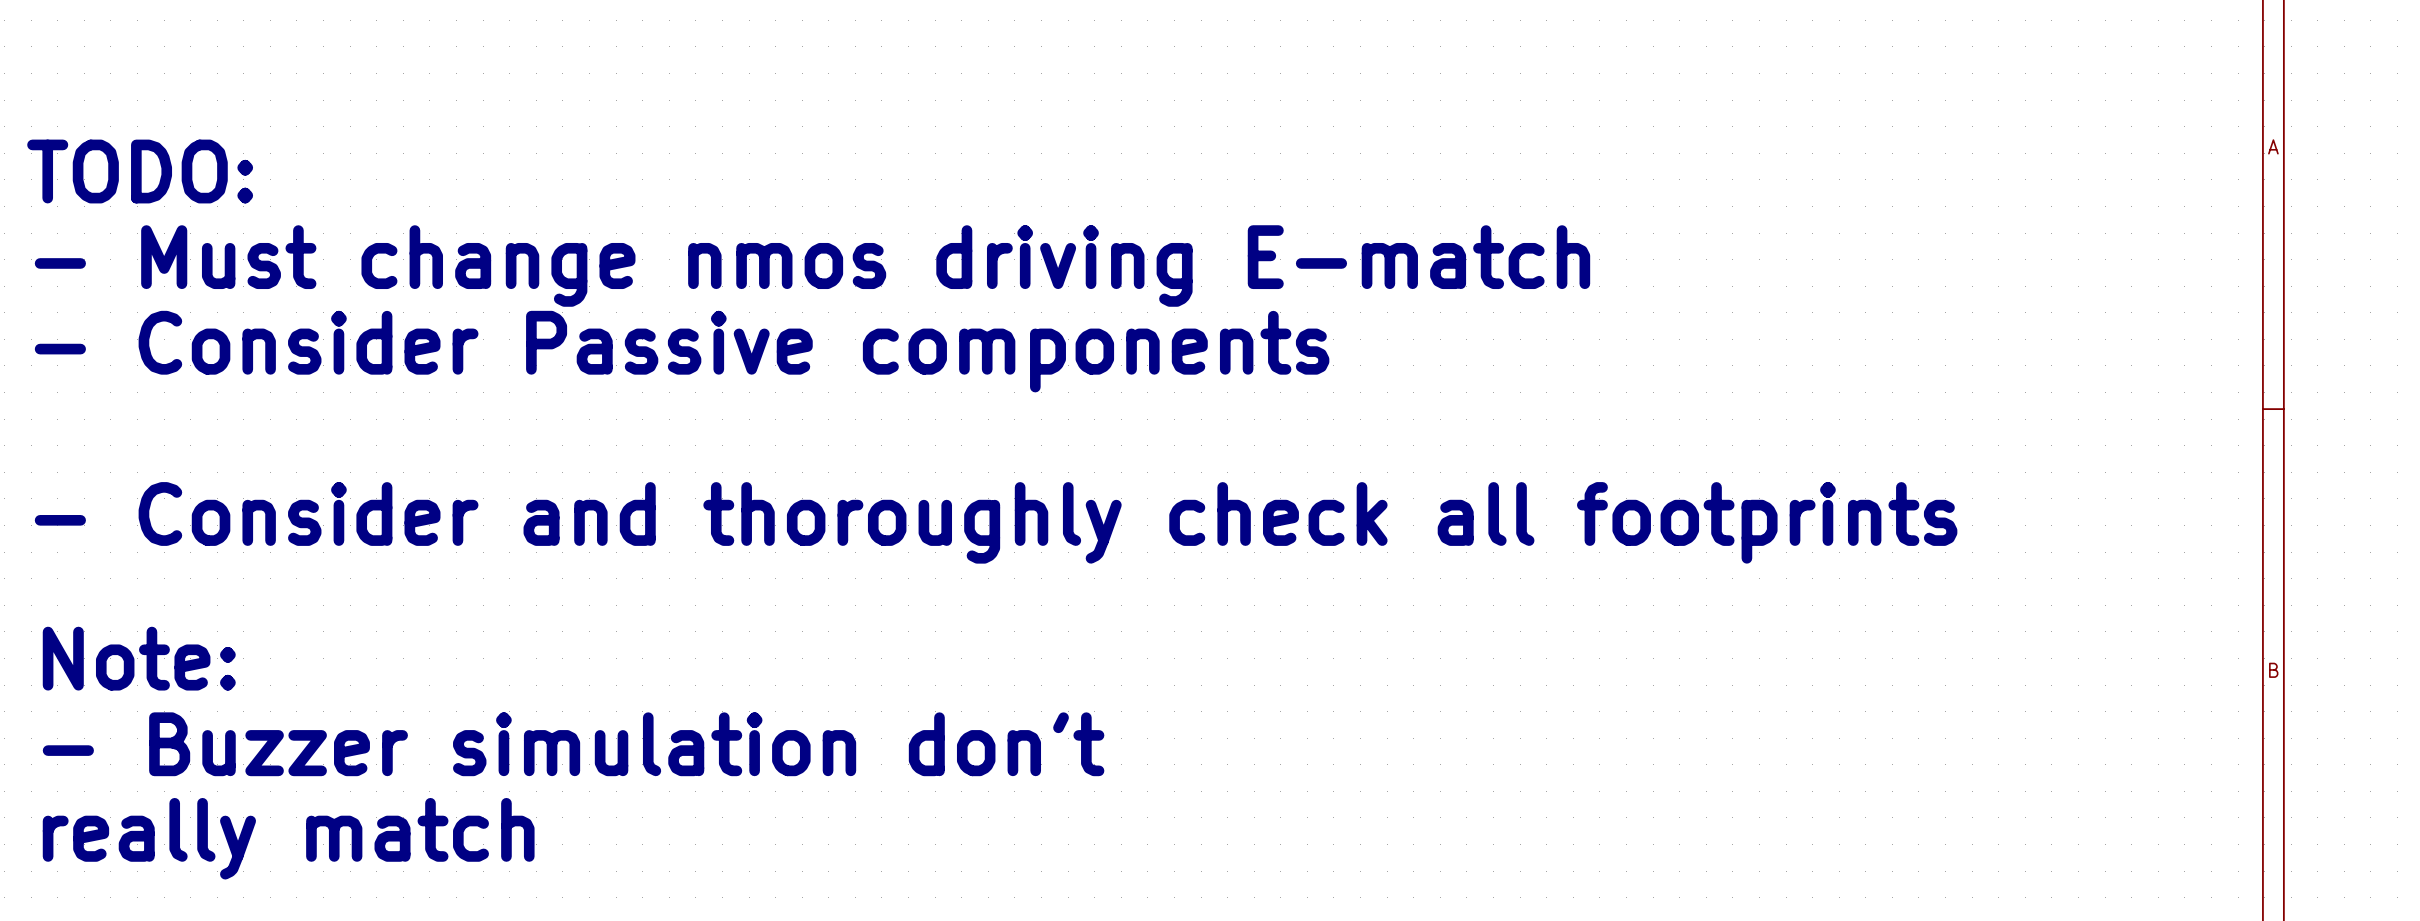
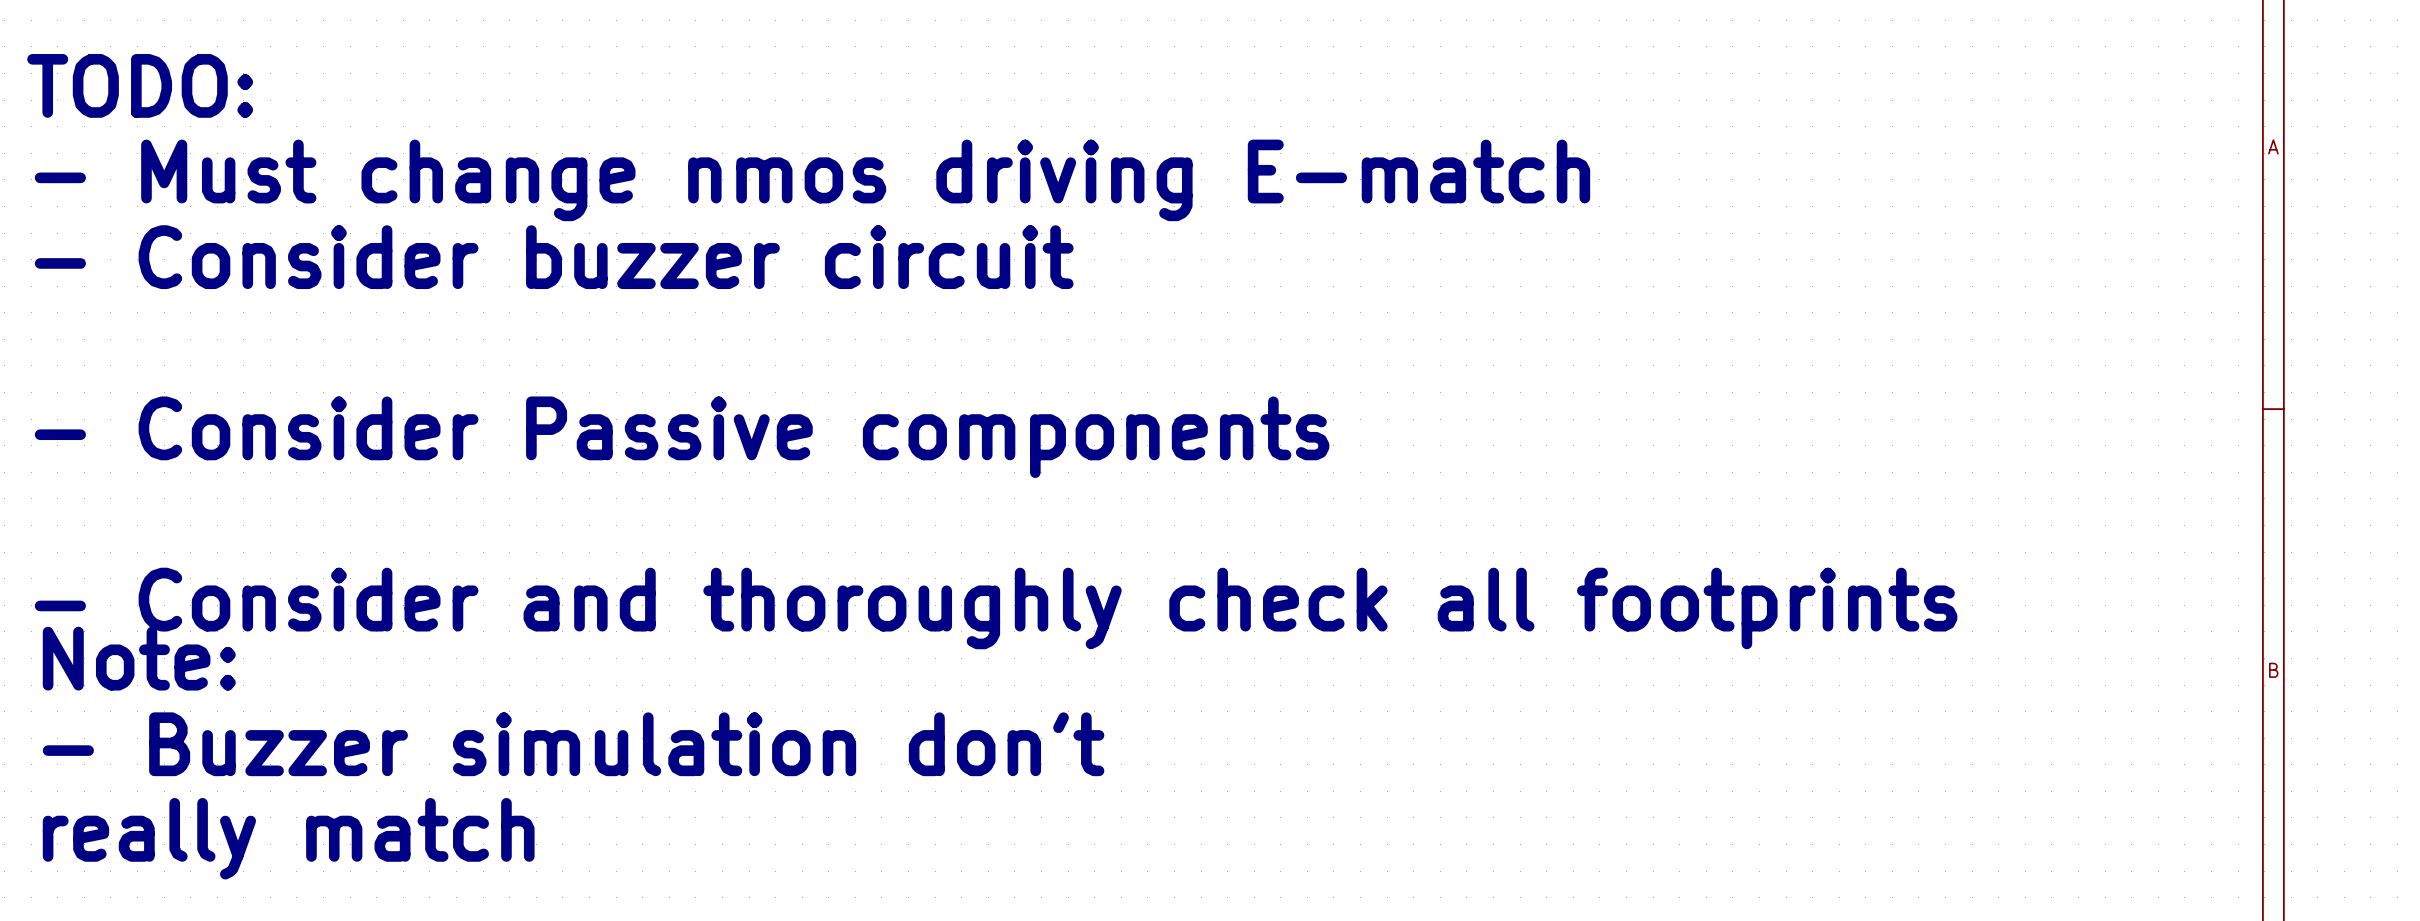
text: none -> TODO: (140, 85)
text: TODO: (140, 171) -> - Must change nmos driving E-match (812, 180)
text: - Must change nmos driving E-match (812, 266) -> - Consider buzzer circuit (554, 257)
text position: - Consider Passive components (682, 351) -> - Consider Passive components (682, 437)
text position: - Consider and thoroughly check all footprints (996, 522) -> - Consider and thoroughly check all footprints (996, 608)

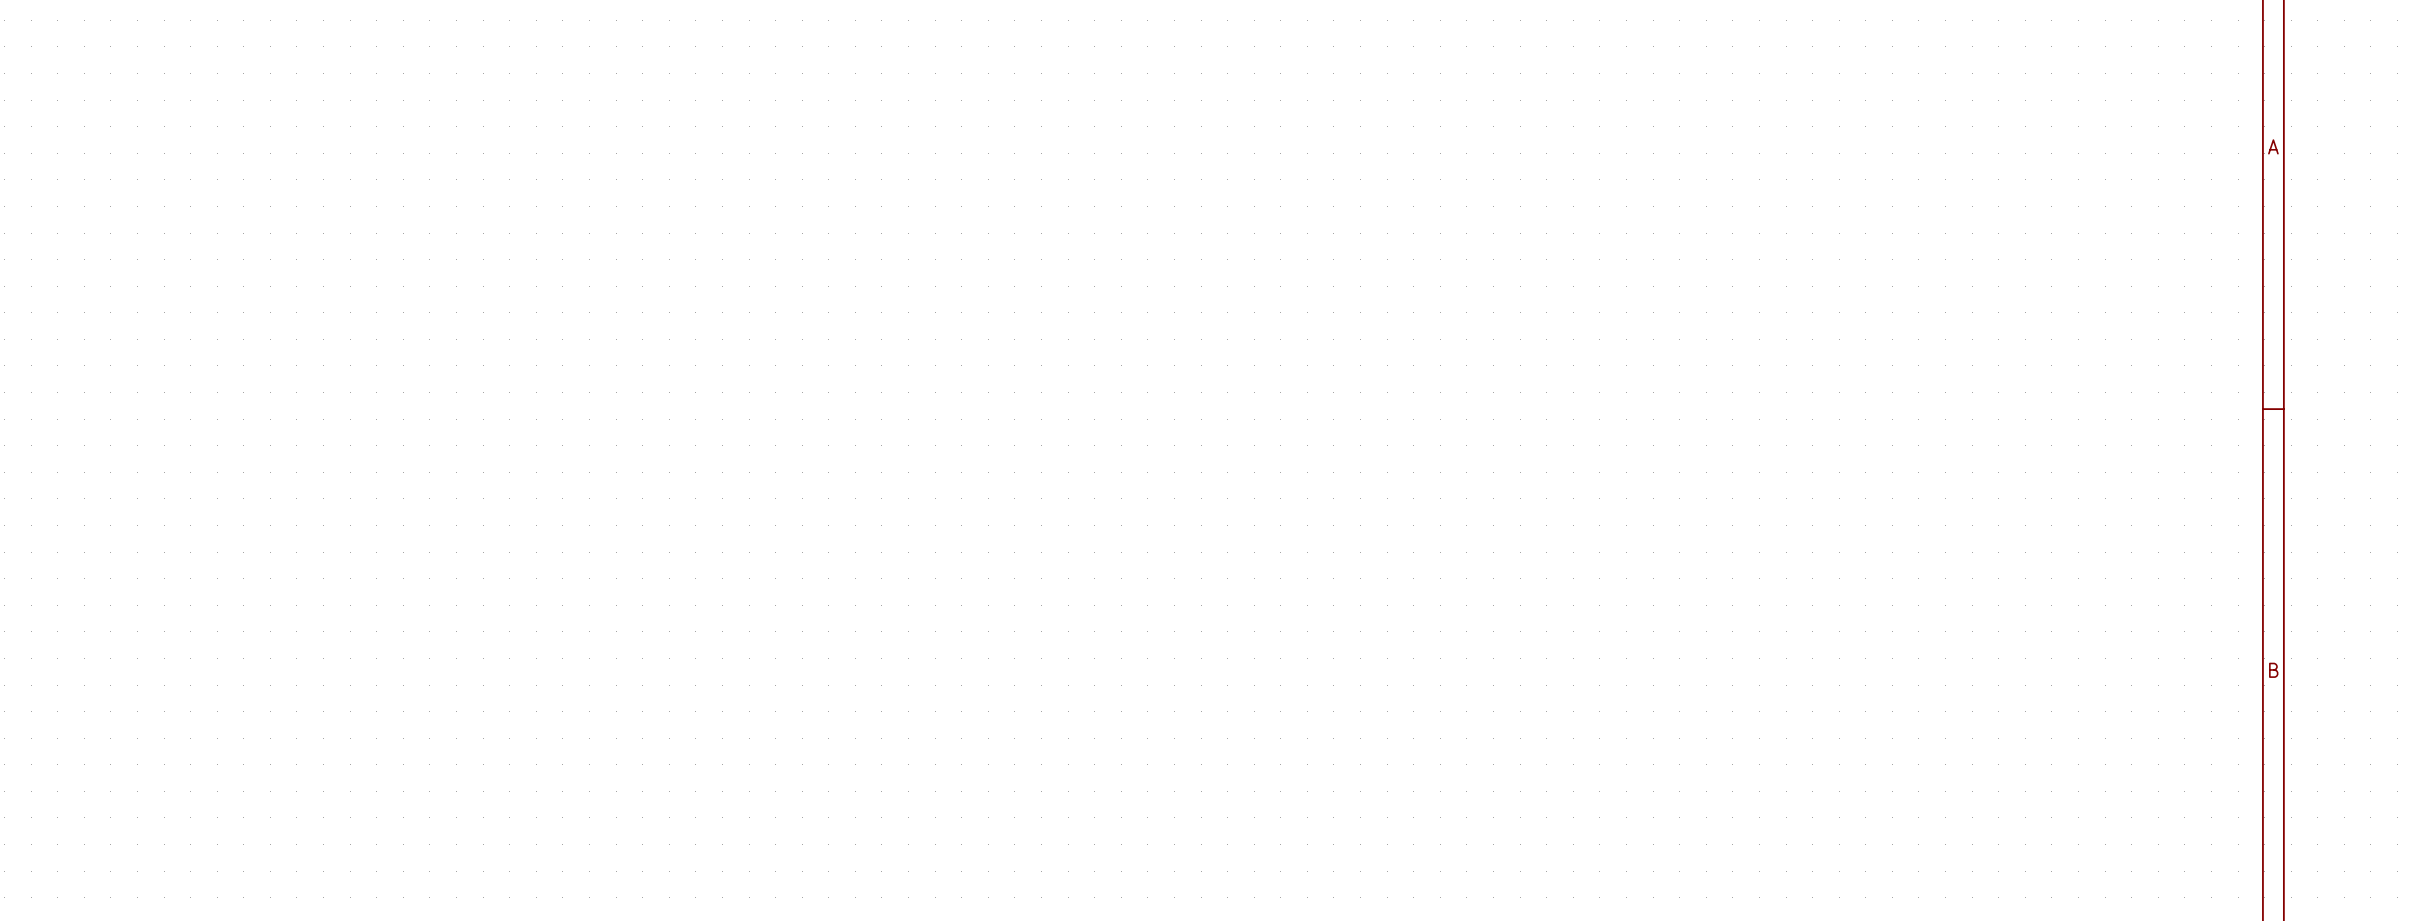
text: TODO: (140, 85) -> none
text: - Must change nmos driving E-match (812, 180) -> none
text: - Consider buzzer circuit (554, 257) -> none
text: - Consider Passive components (682, 437) -> none
text: - Consider and thoroughly check all footprints (996, 608) -> none
text: Note: (139, 658) -> none
text: - Buzzer simulation don't (573, 744) -> none
text: really match (288, 838) -> none

